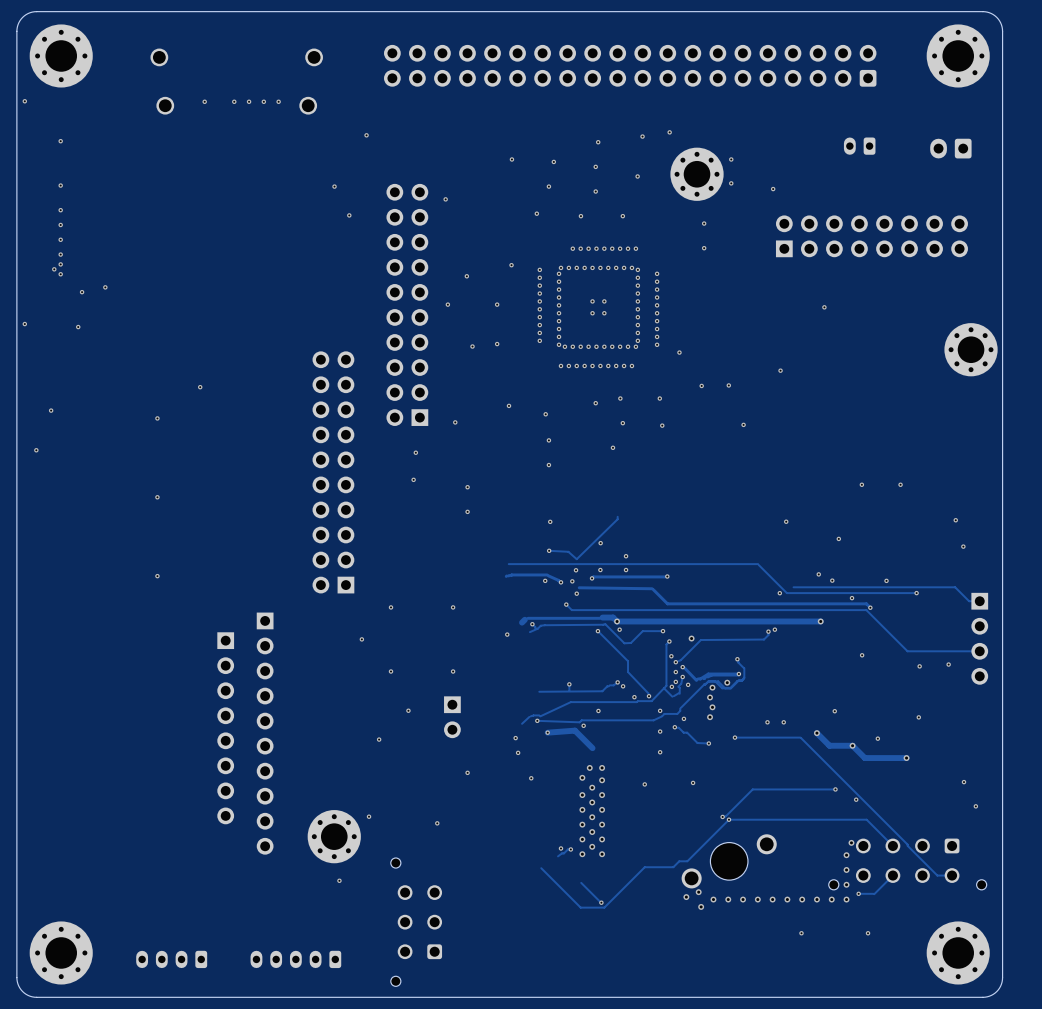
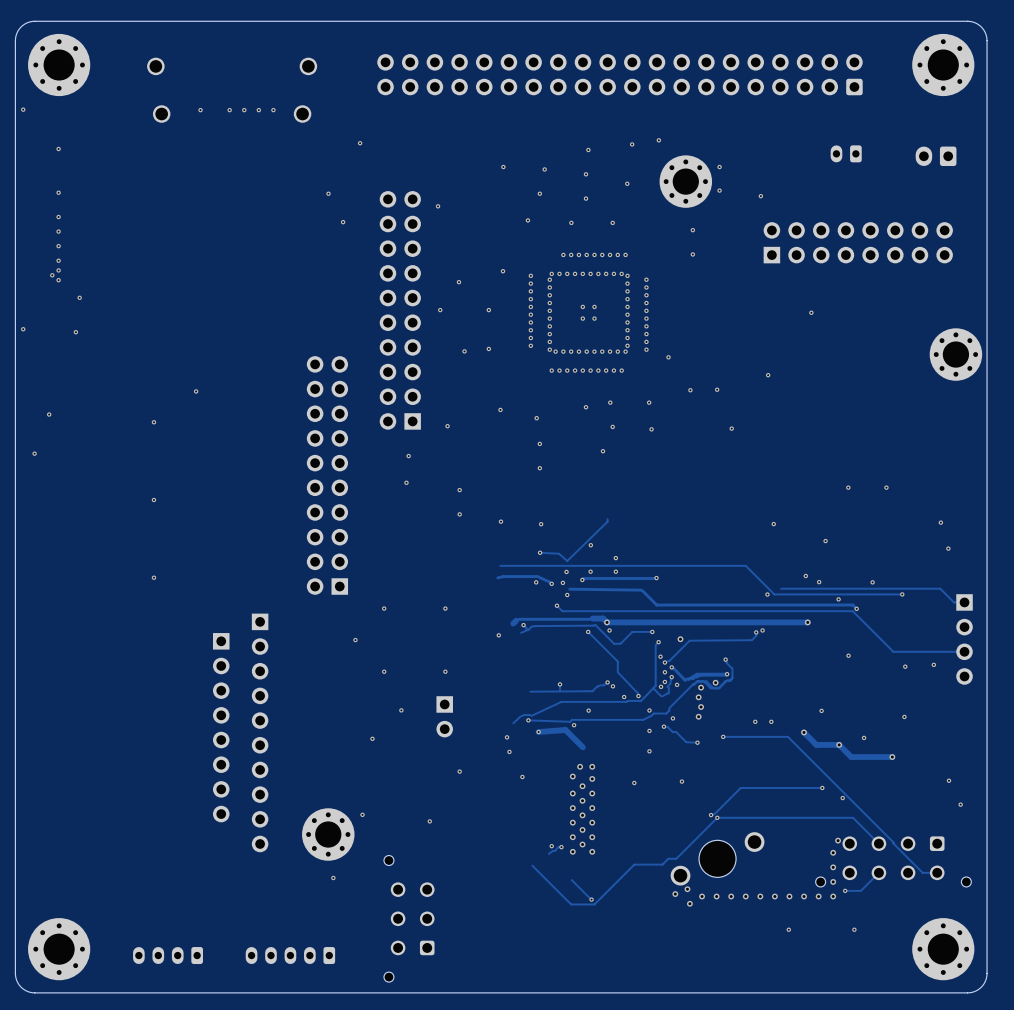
via: (105, 287) -> none
via: none -> (500, 521)

